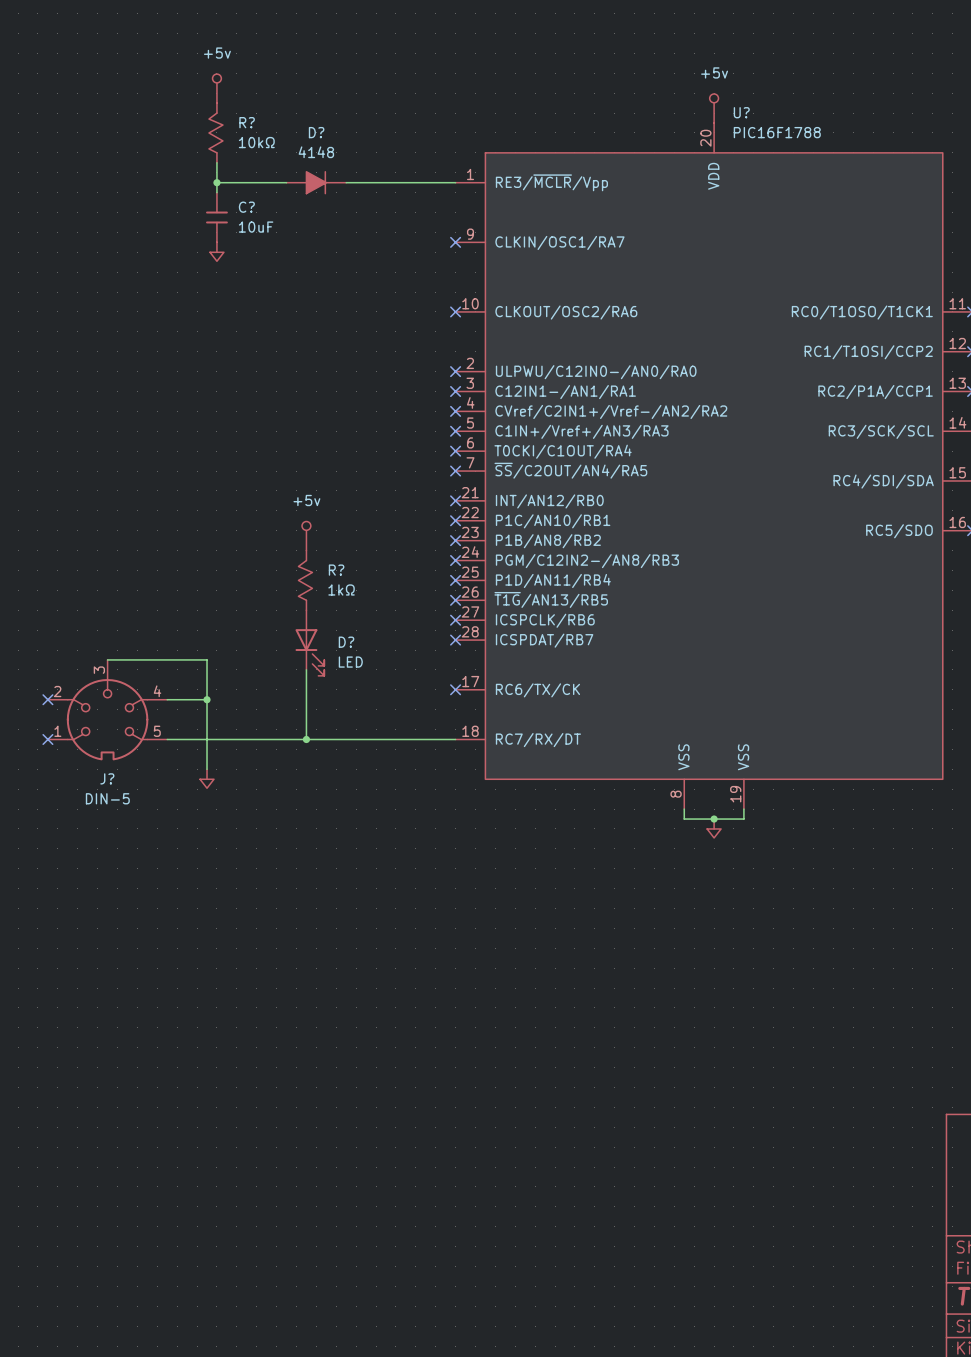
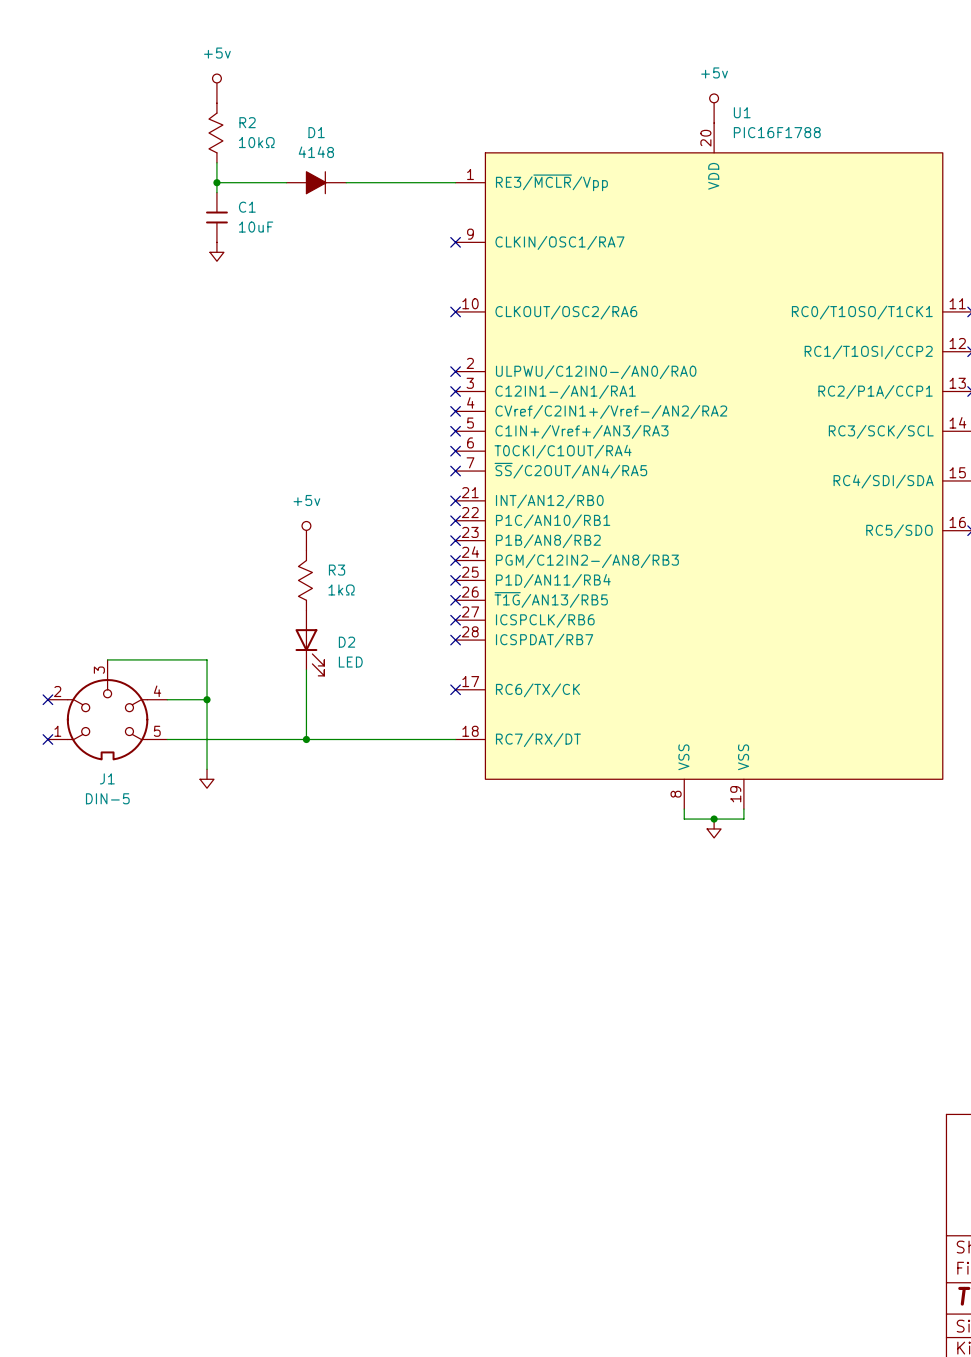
U? name: U? (741, 112) -> U1 (742, 112)
R? name: R? (247, 122) -> R2 (247, 122)
D? name: D? (316, 132) -> D1 (316, 132)
C? name: C? (246, 207) -> C1 (247, 207)
R? name: R? (336, 570) -> R3 (337, 570)
D? name: D? (346, 642) -> D2 (346, 642)
J? name: J? (107, 778) -> J1 (107, 778)

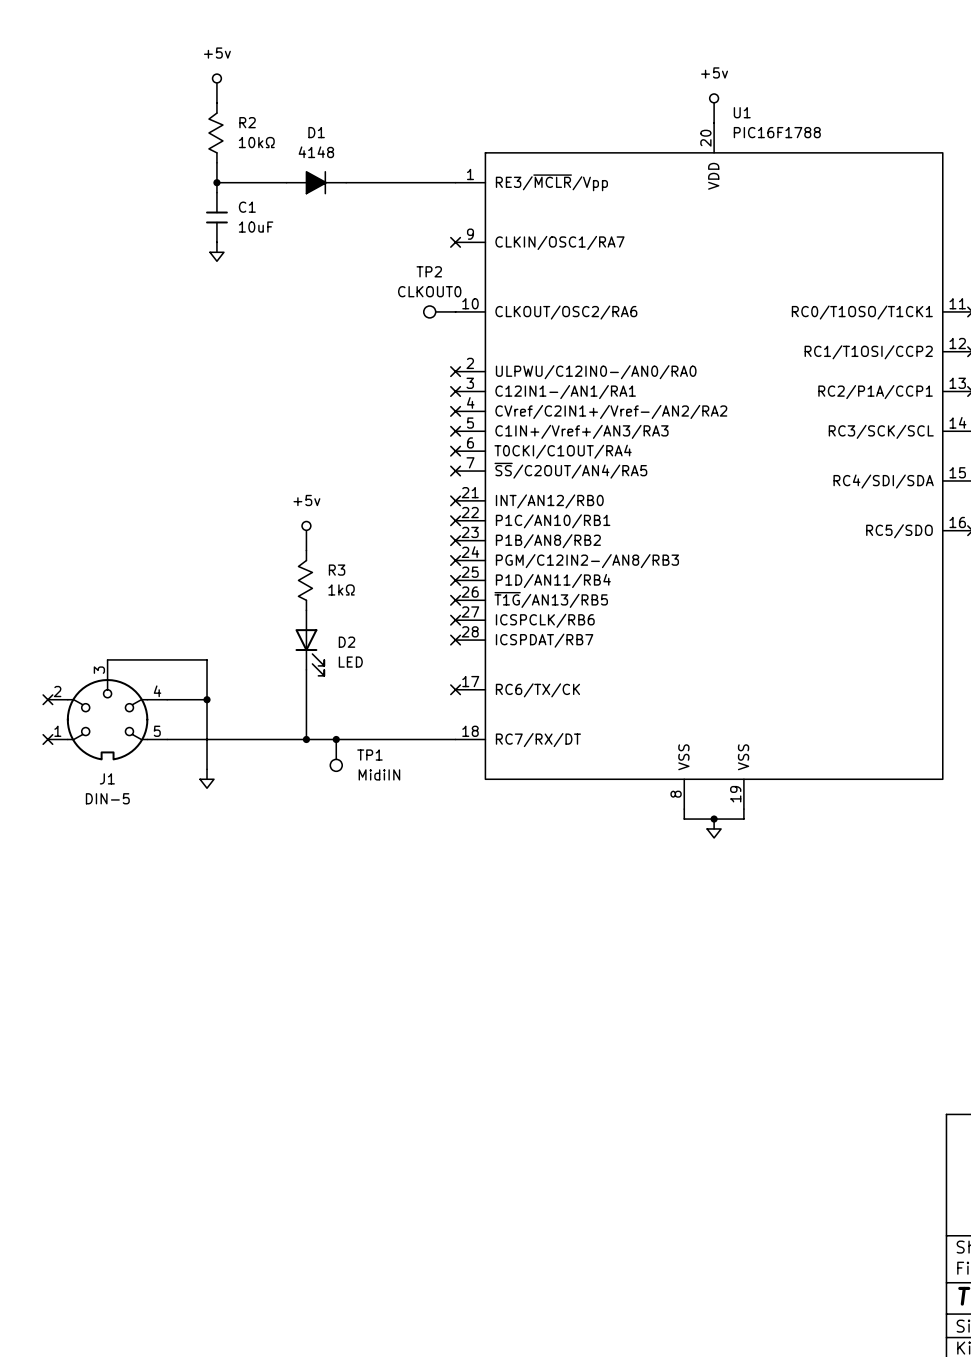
TP2: none -> CLKOUT0 (439, 311)
no-connect mark: (455, 311) -> none
junction: none -> (336, 739)
TP1: none -> MidiIN (336, 755)

